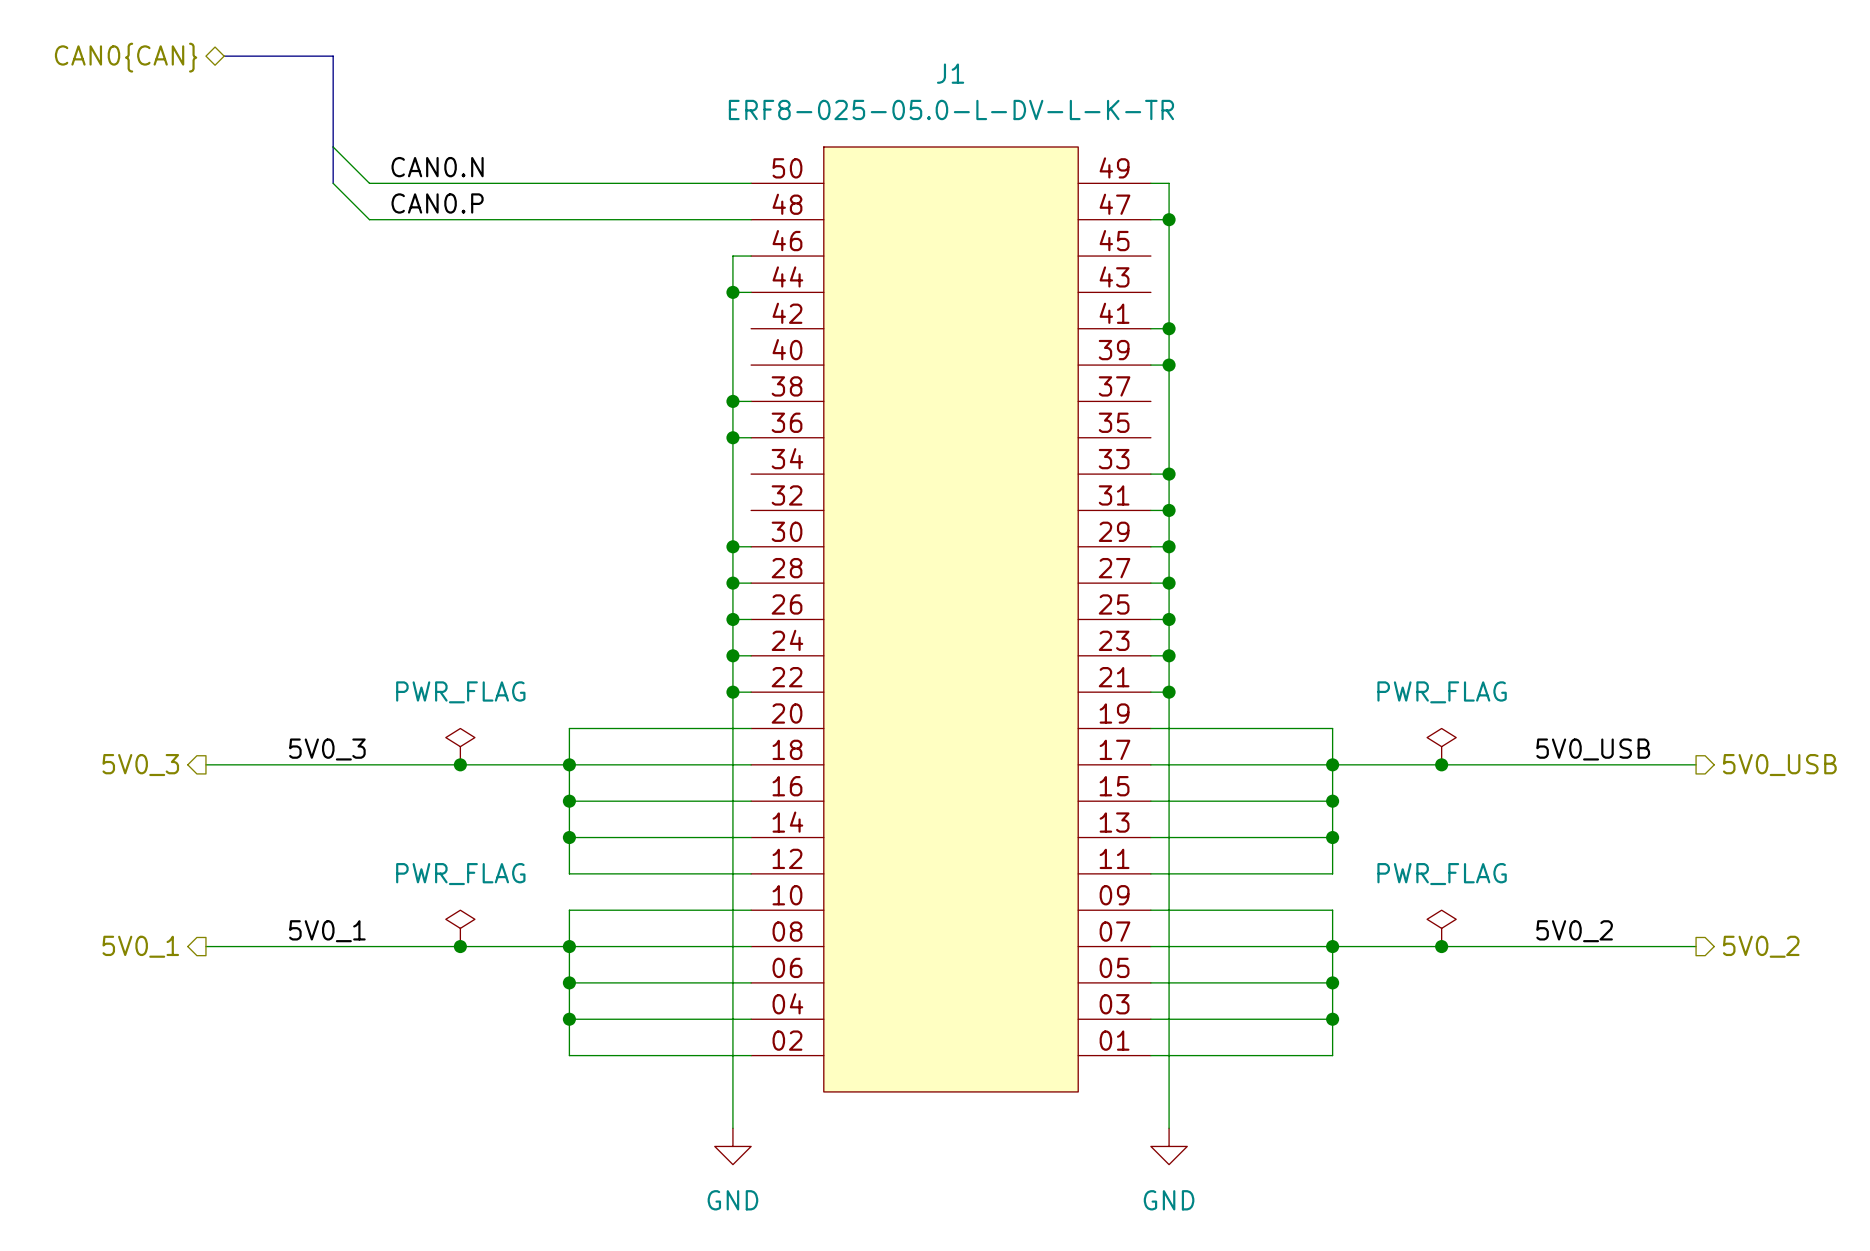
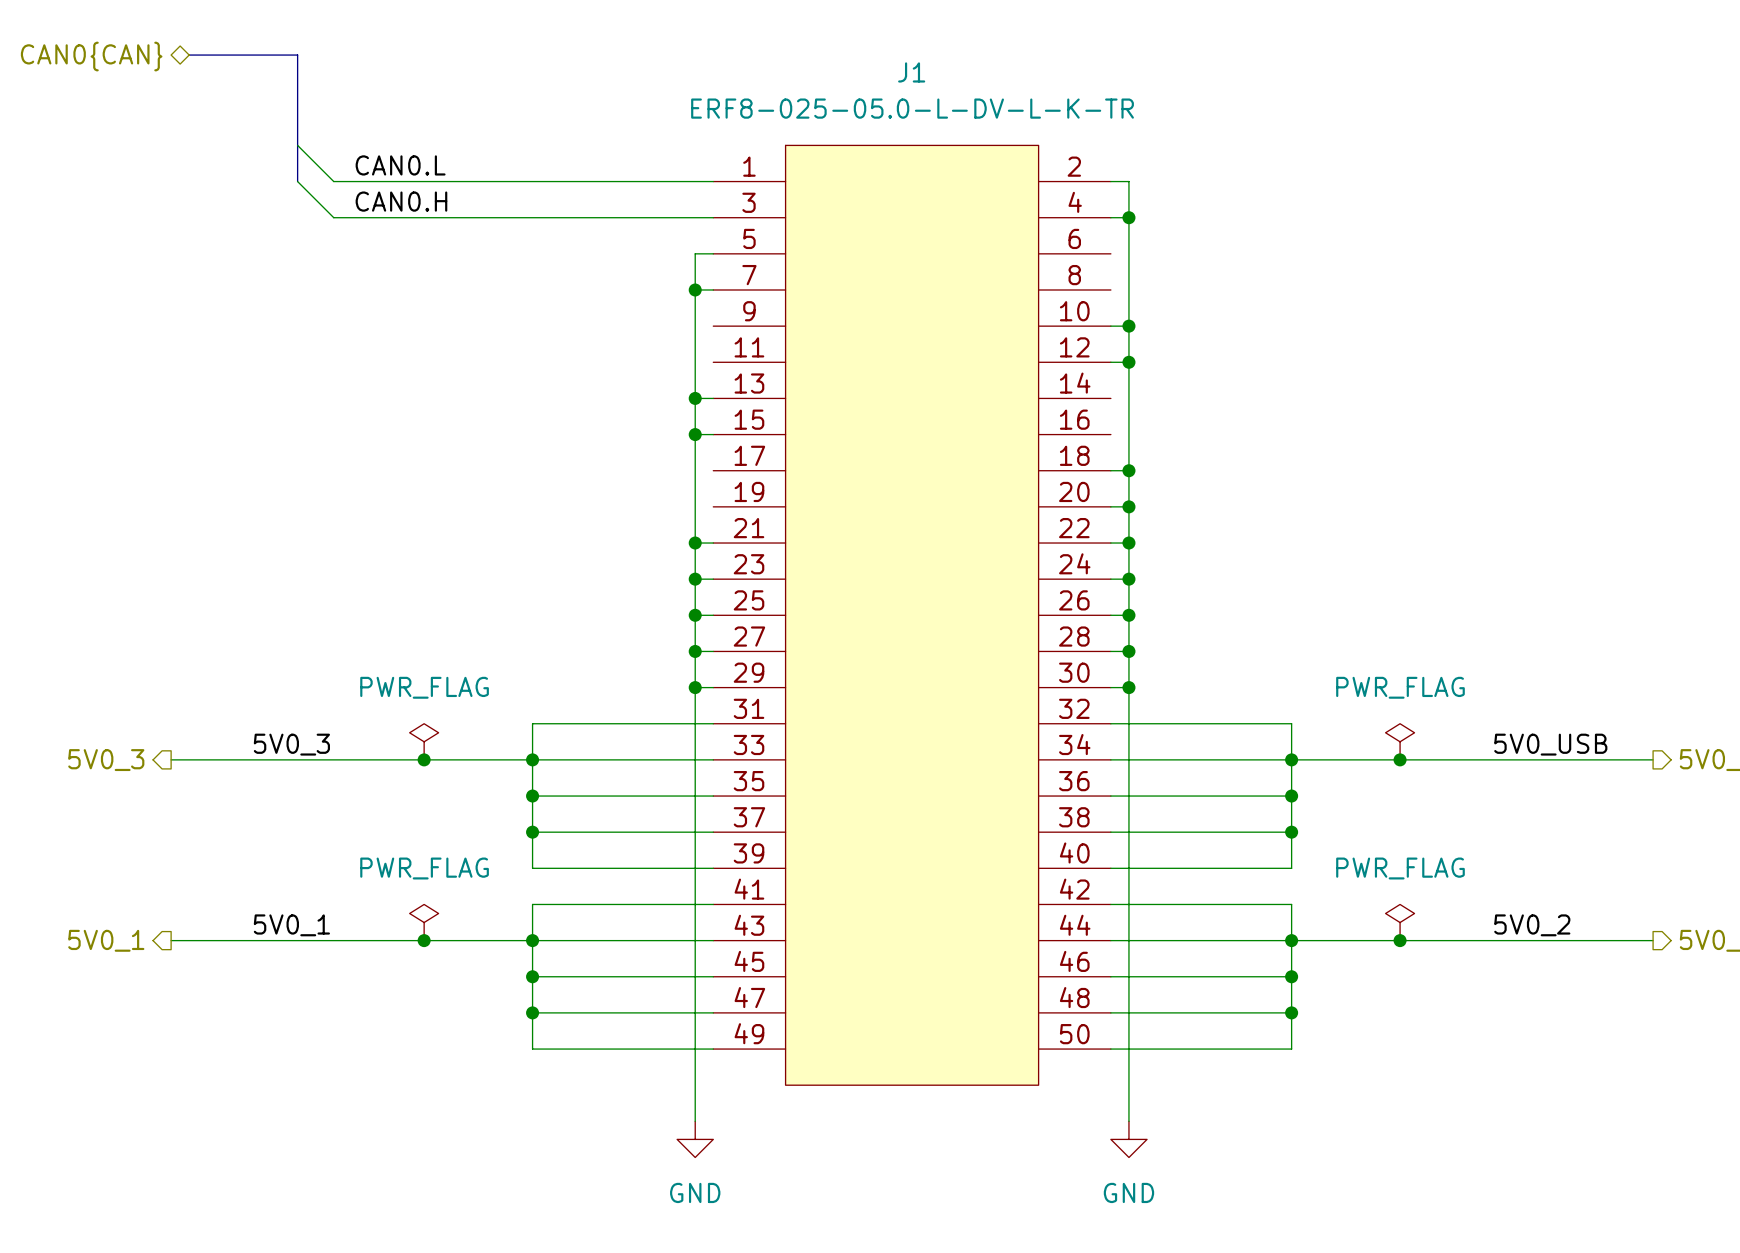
J1 symbol: [751, 147, 1151, 1092] -> [713, 145, 1111, 1086]
label: CAN0.N (437, 167) -> CAN0.L (400, 165)
label: CAN0.P (437, 203) -> CAN0.H (401, 201)

